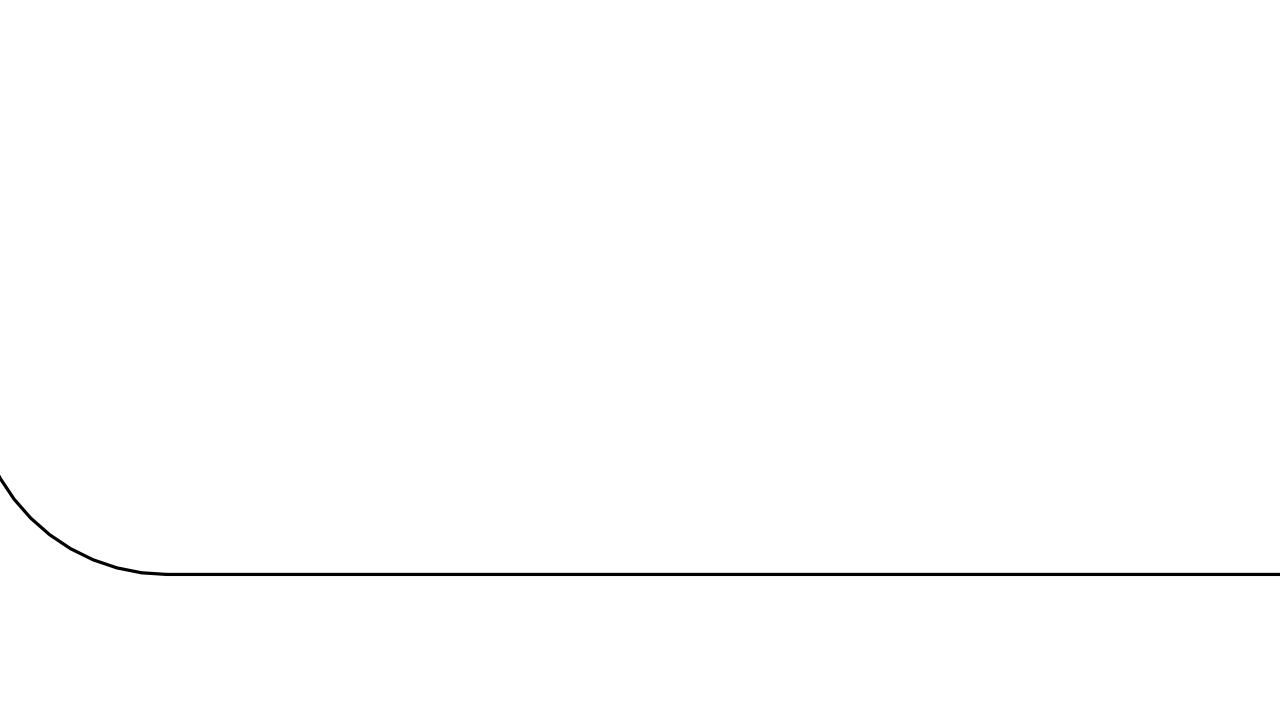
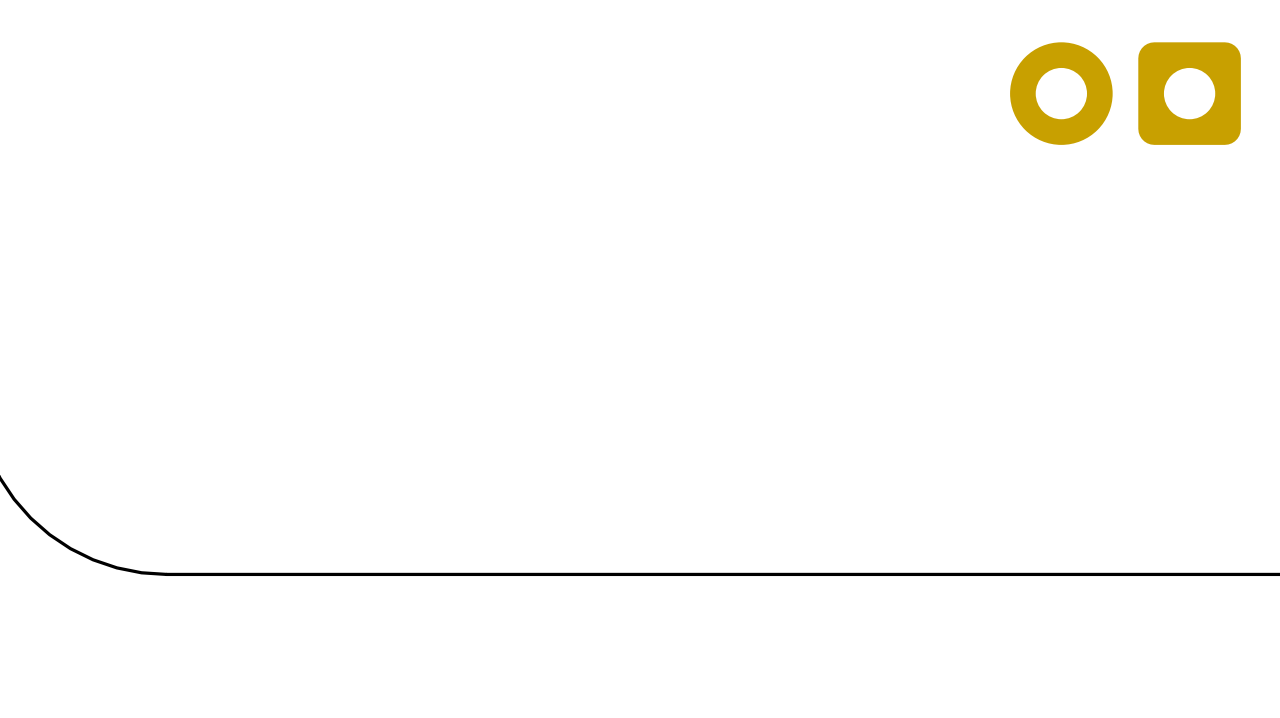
part: none -> (1125, 93)

